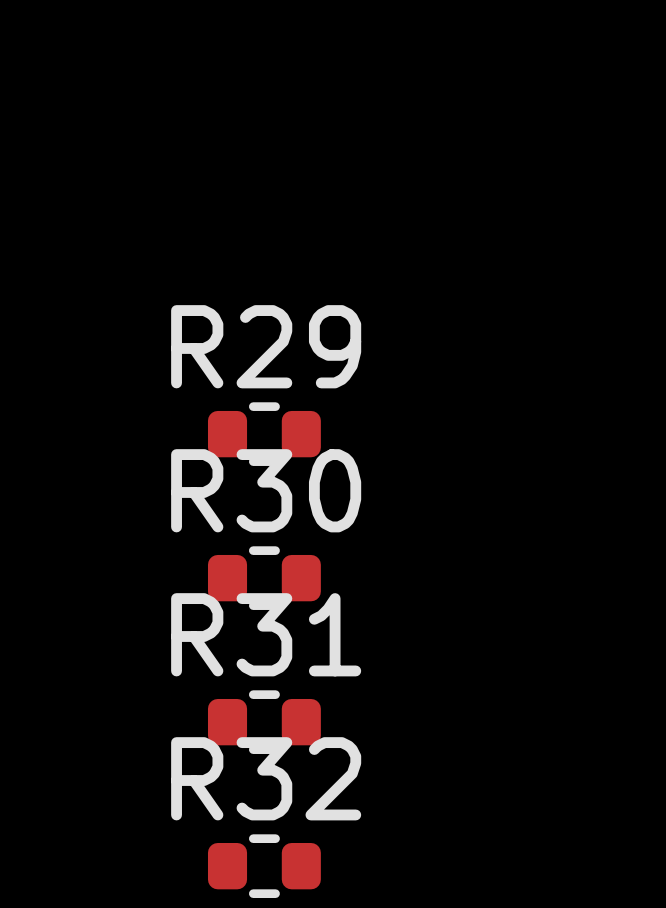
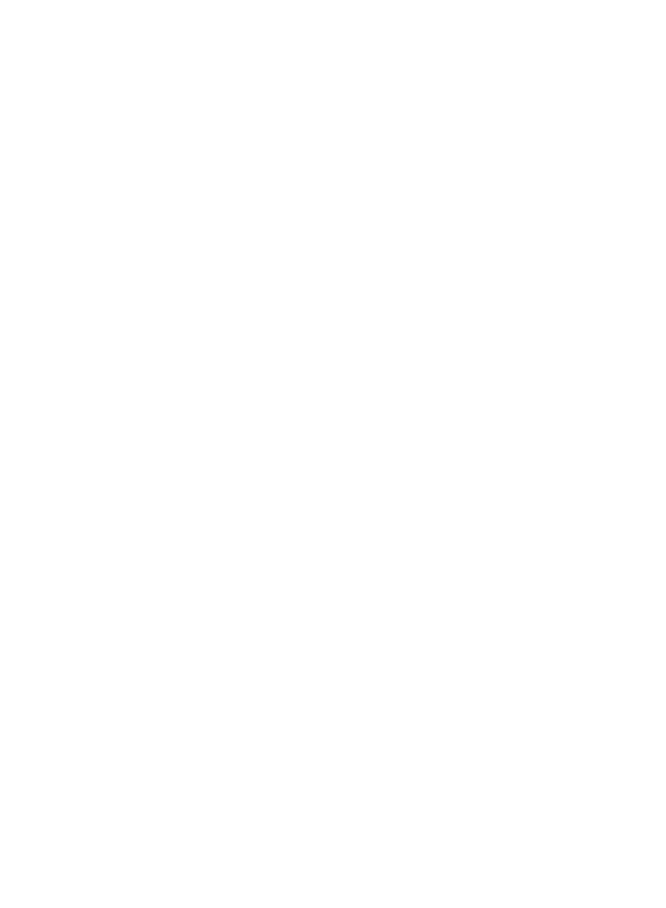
R29: (264, 434) -> none
R30: (264, 578) -> none
R31: (264, 722) -> none
R32: (264, 866) -> none

